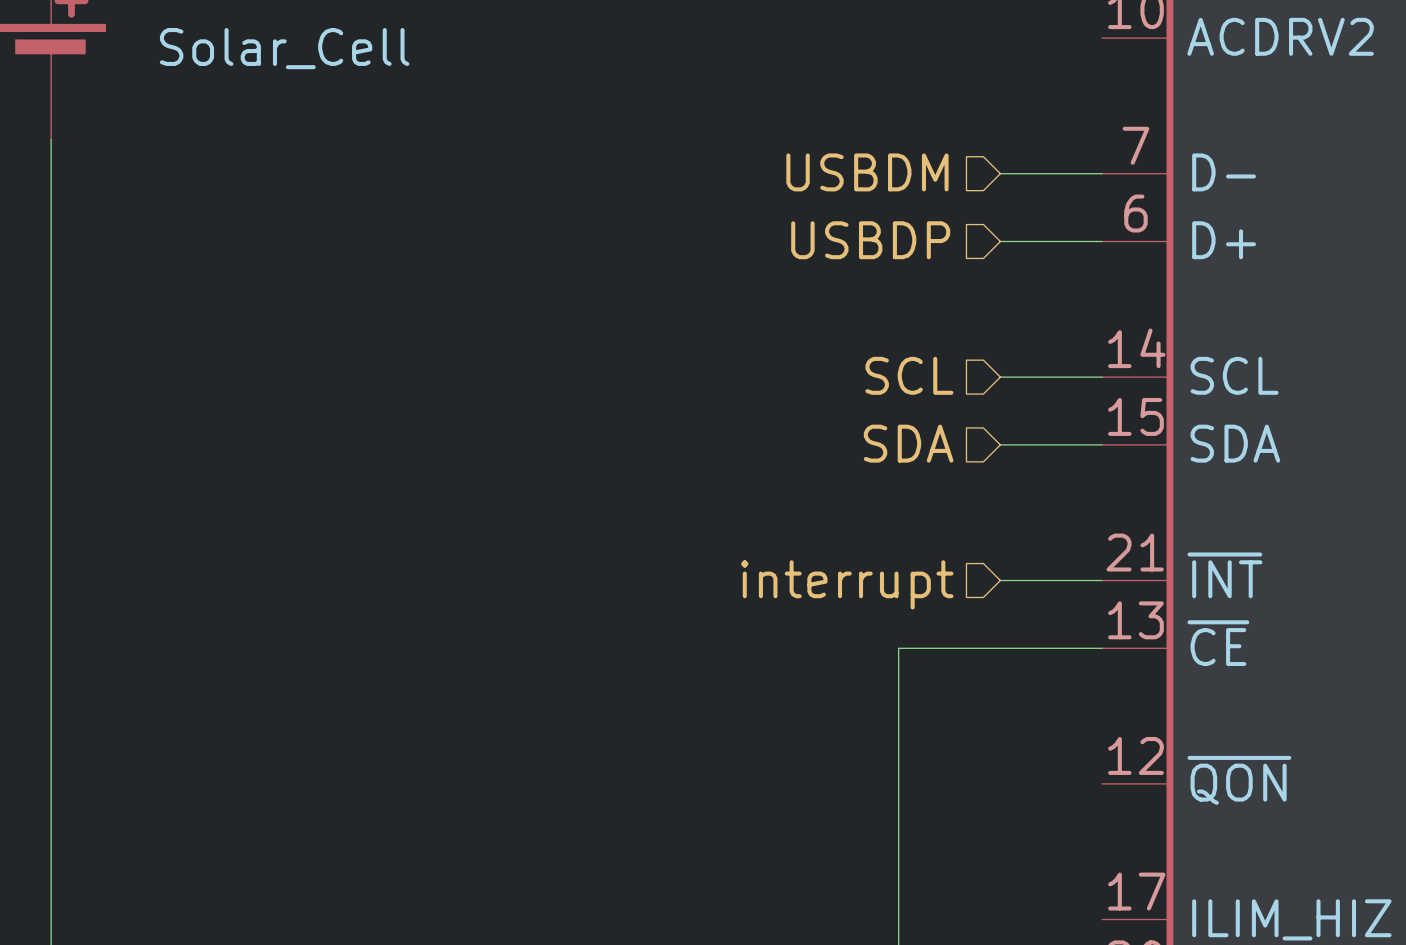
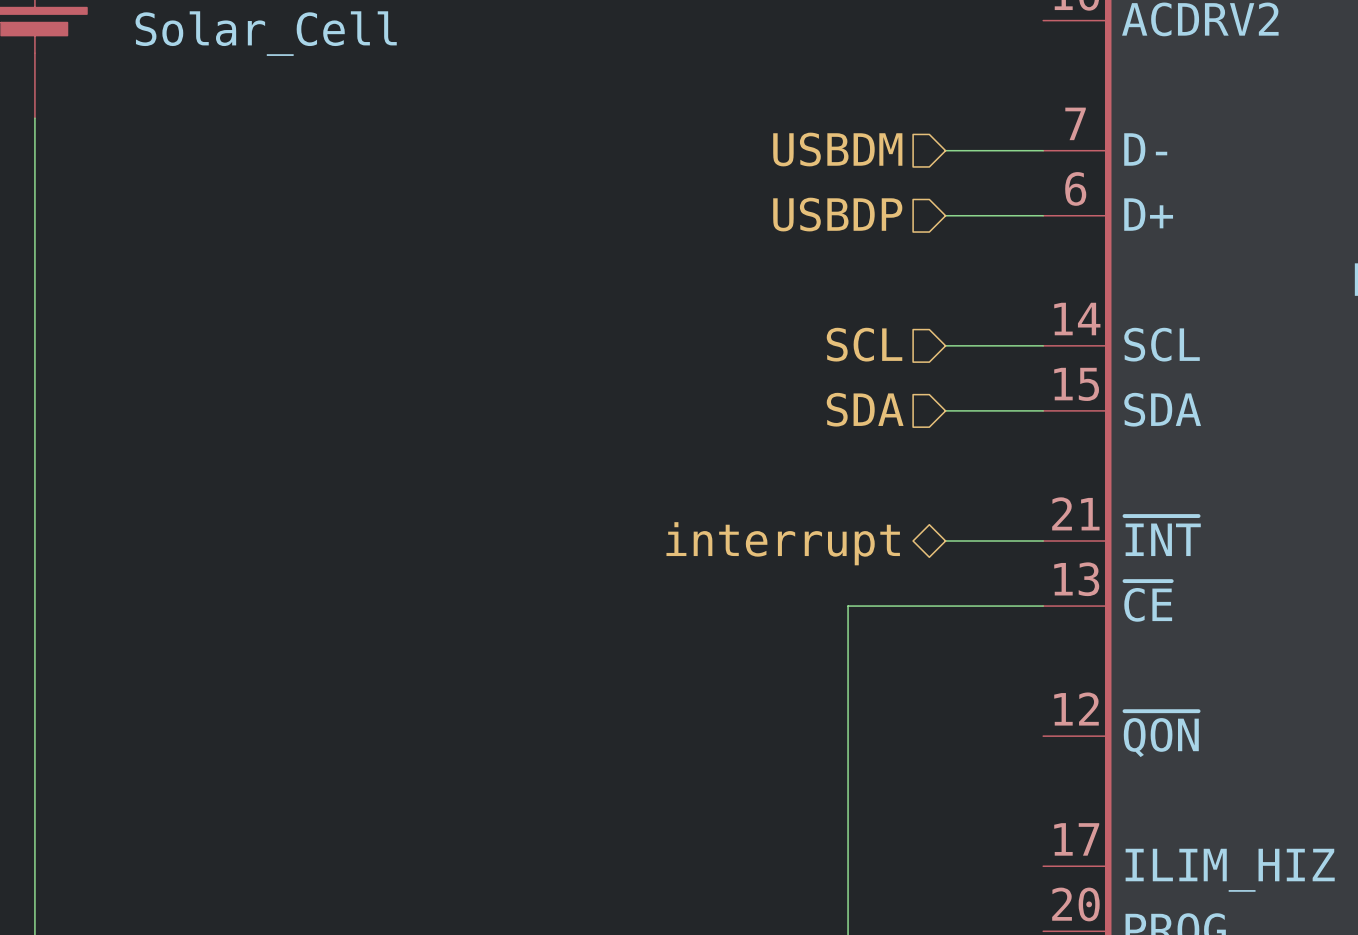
hierarchical label shape: input (847, 584) -> bidirectional (783, 543)

